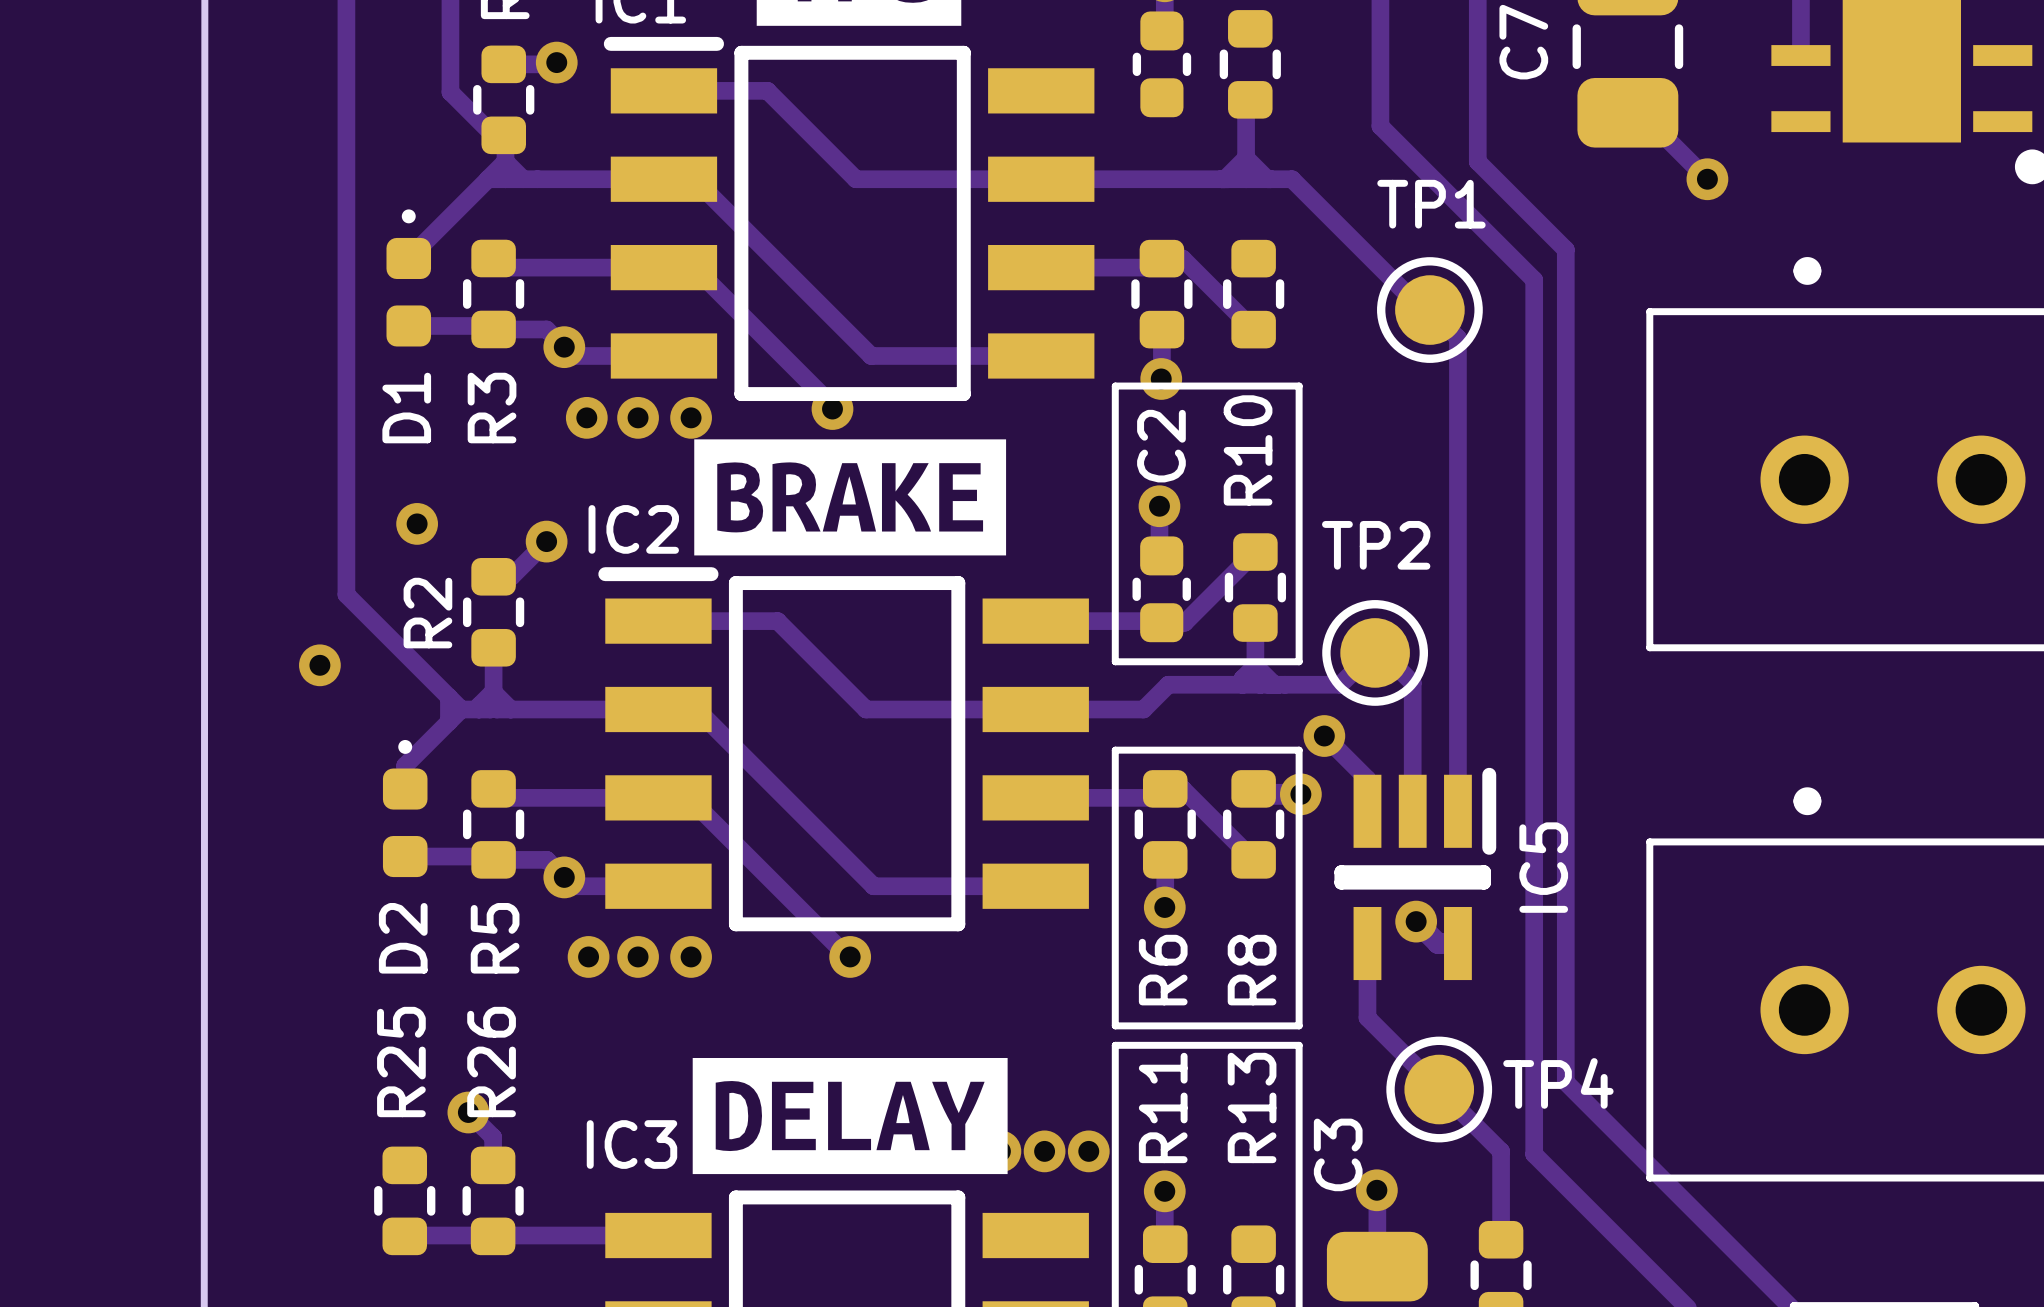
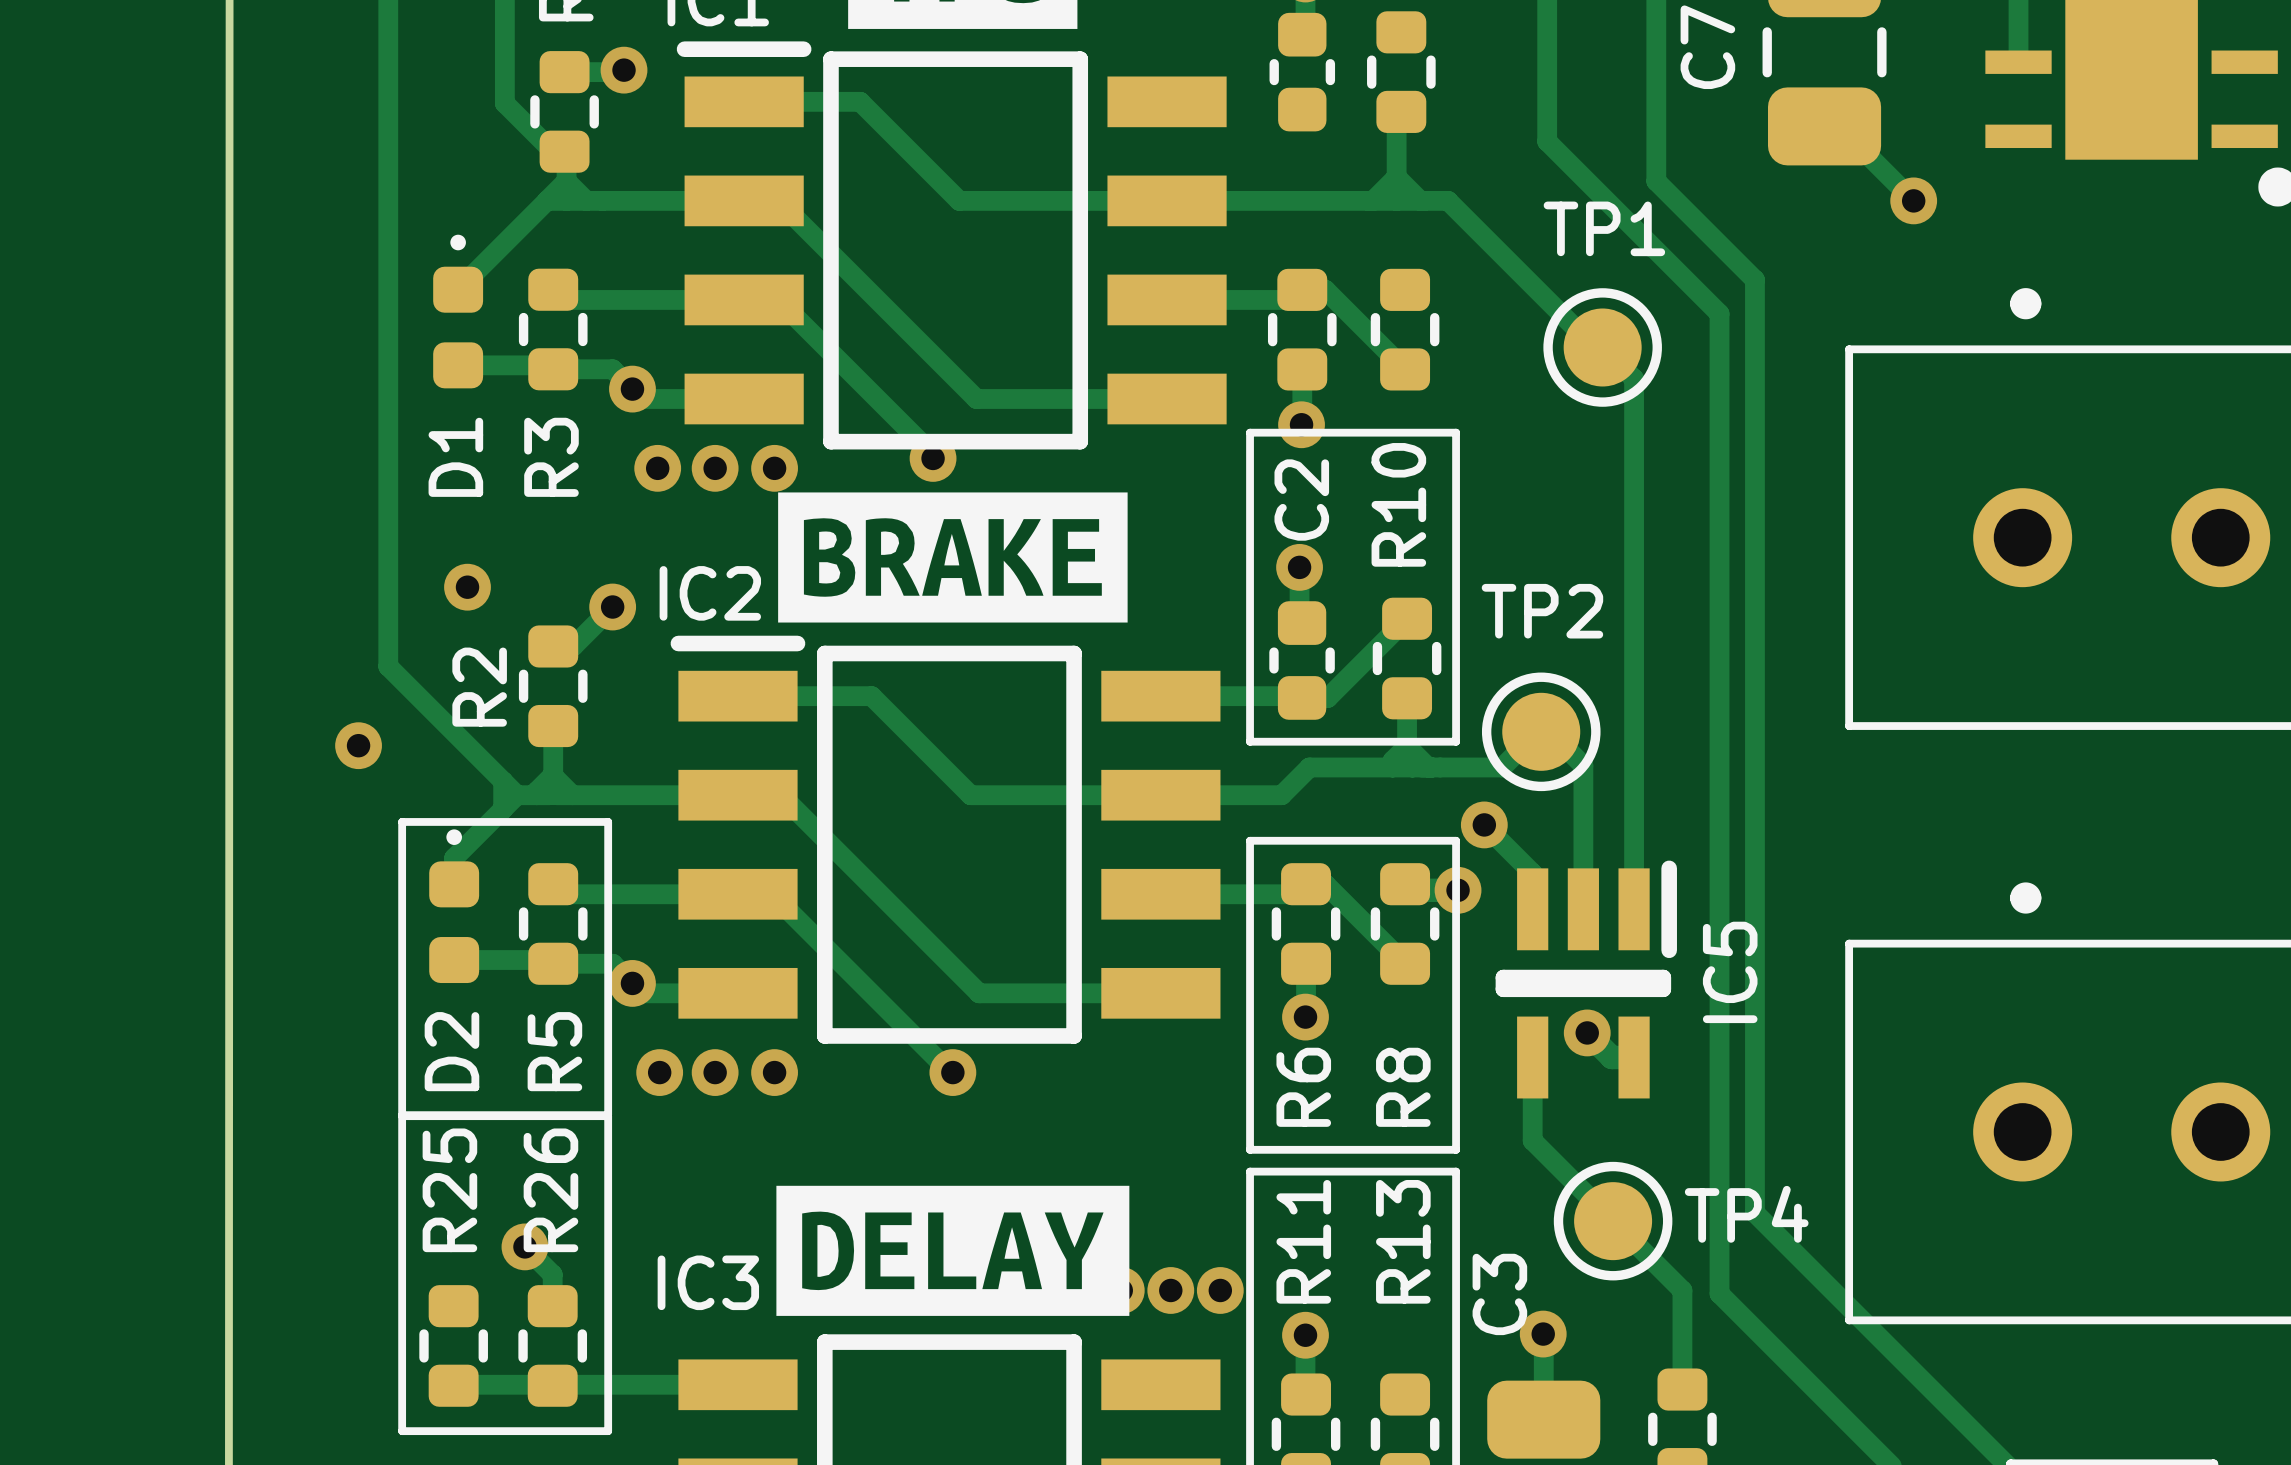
line: none -> (402, 821) (608, 821) (608, 1115) (402, 1115) (402, 821)
line: none -> (402, 1116) (402, 1431) (608, 1431) (608, 1116) (402, 1116)

